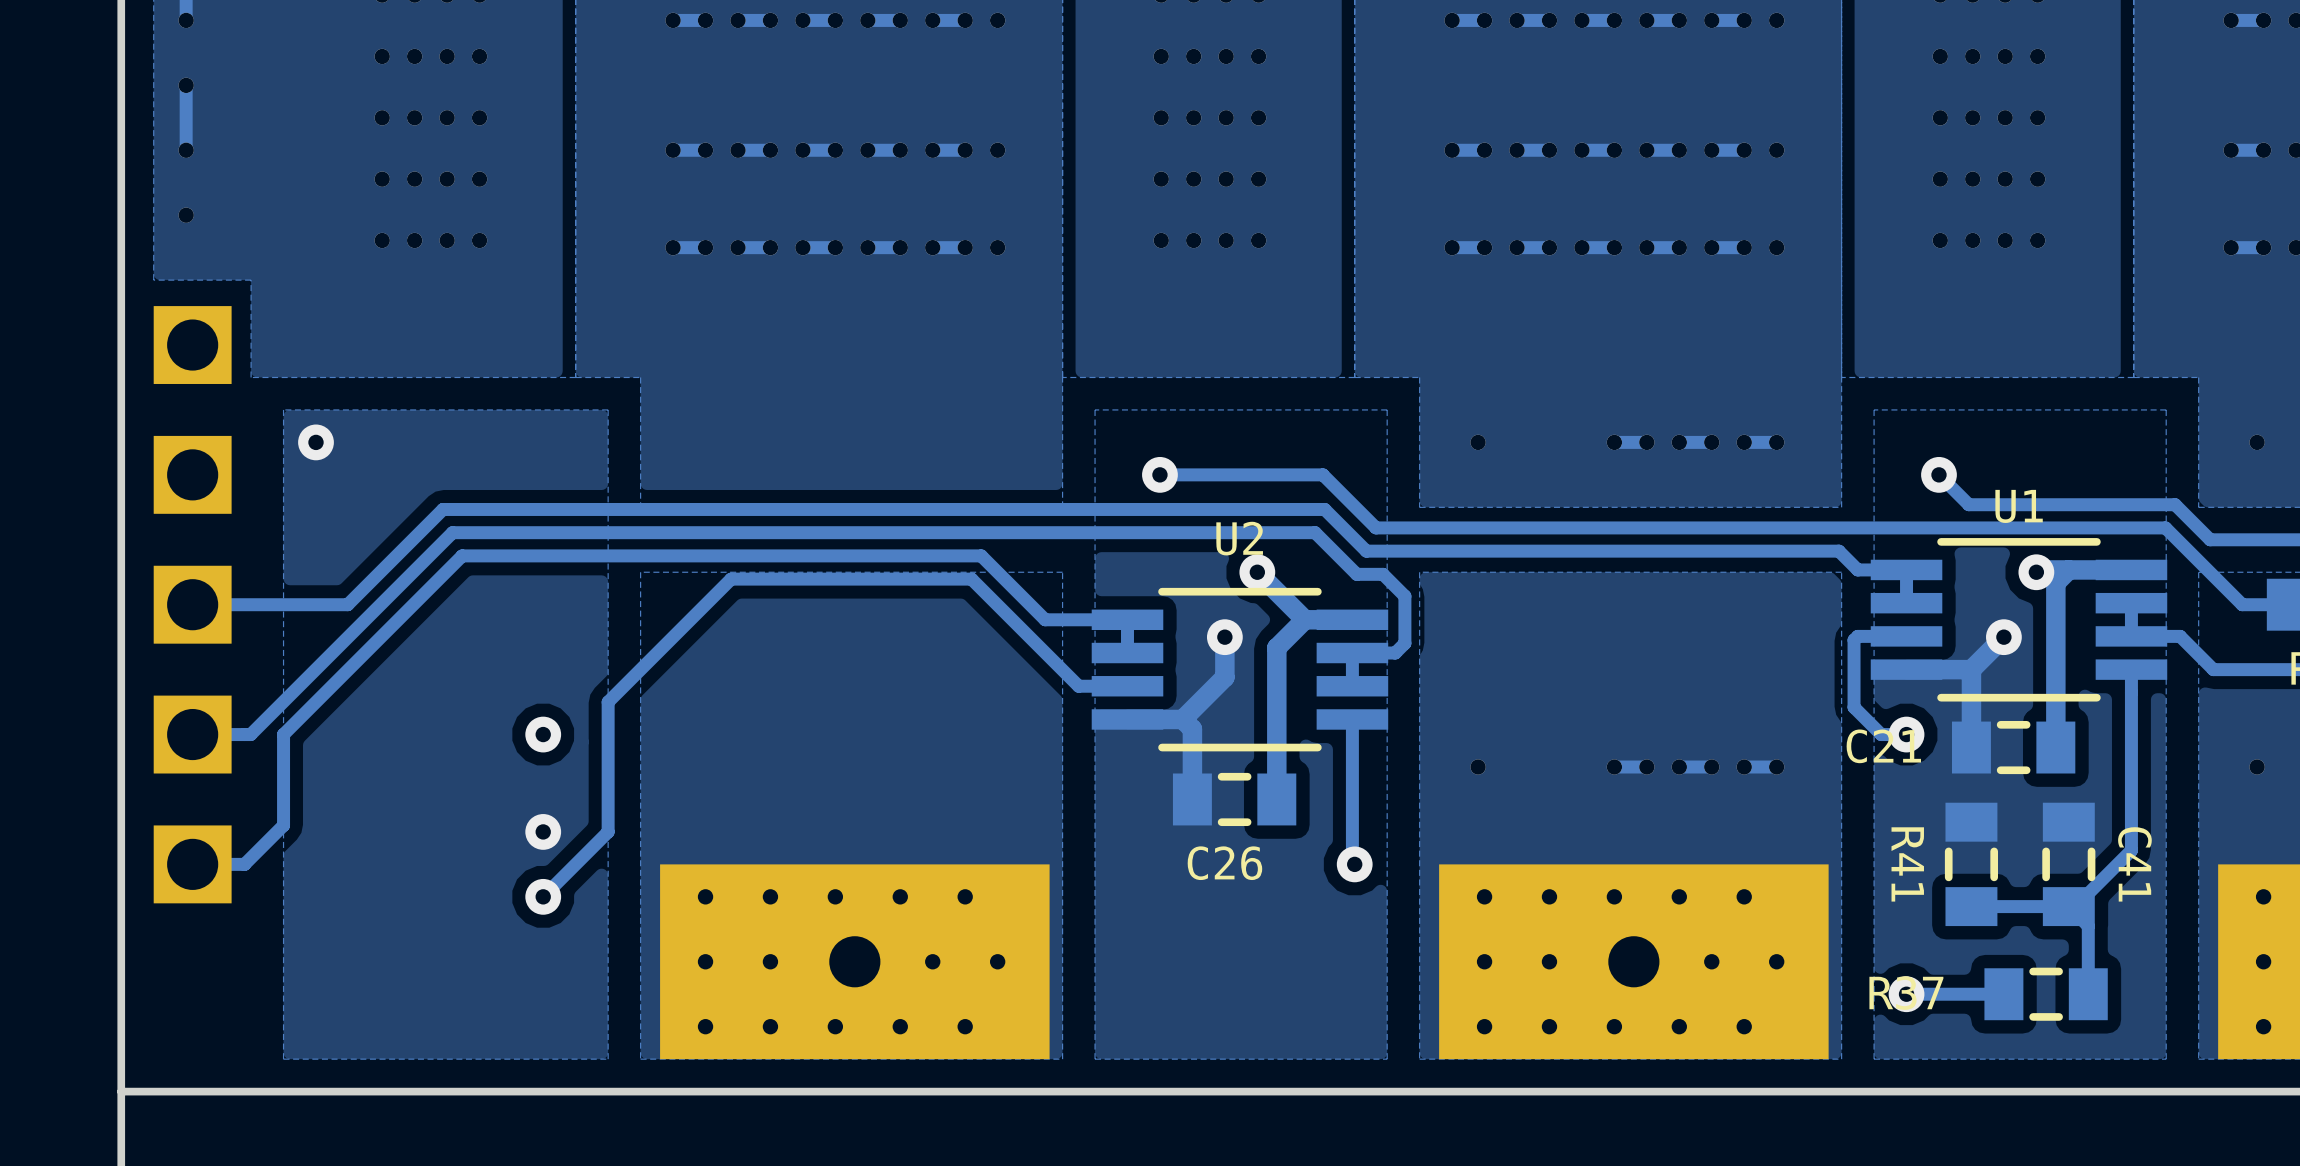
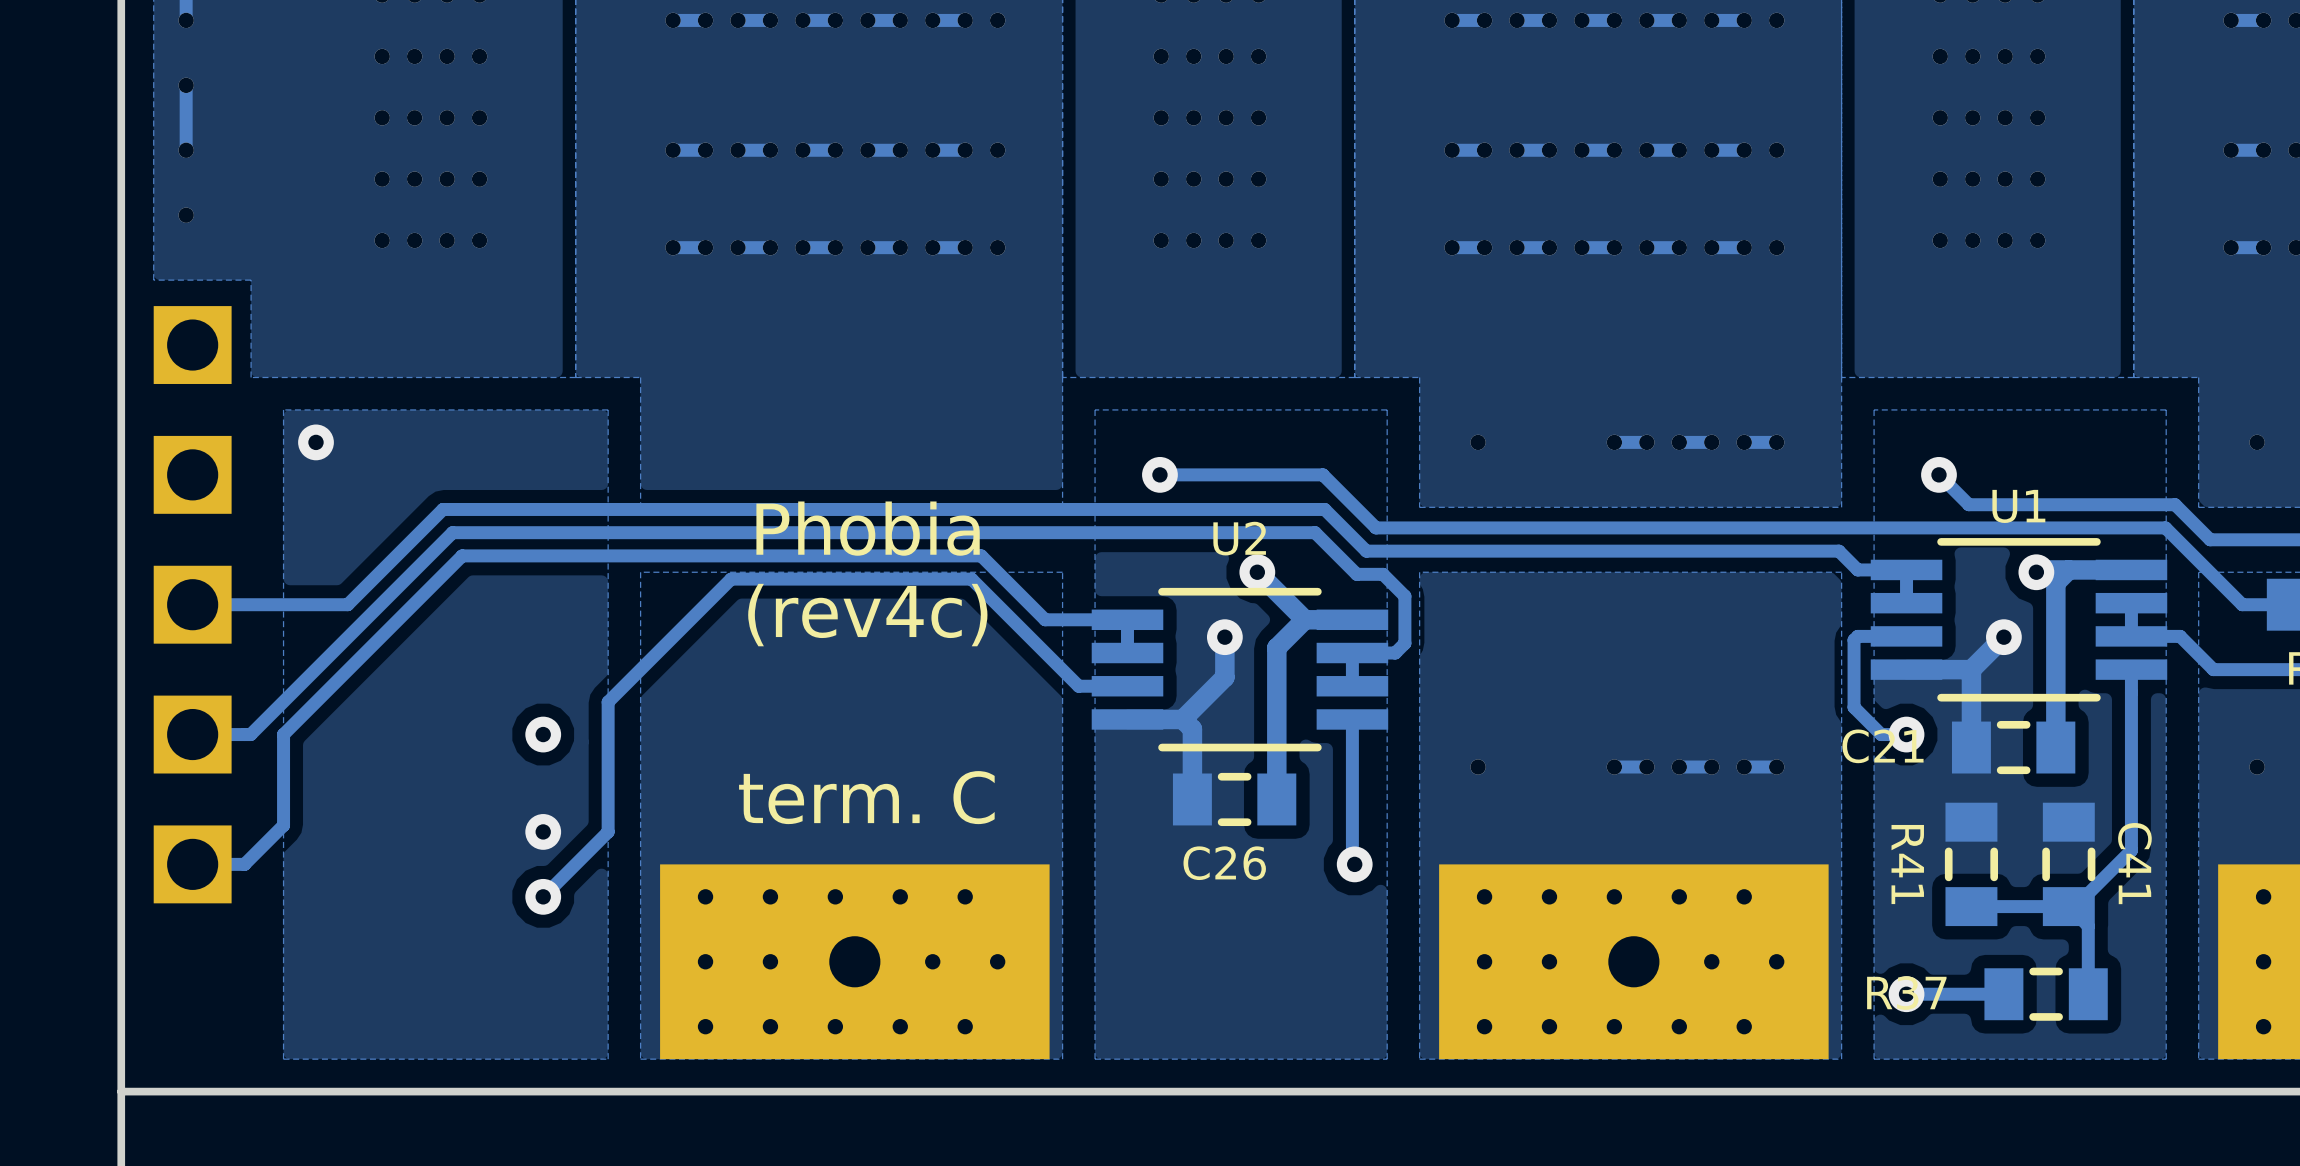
text: none -> Phobia (868, 528)
text: none -> (rev4c) (867, 615)
text: none -> term. C (866, 797)

